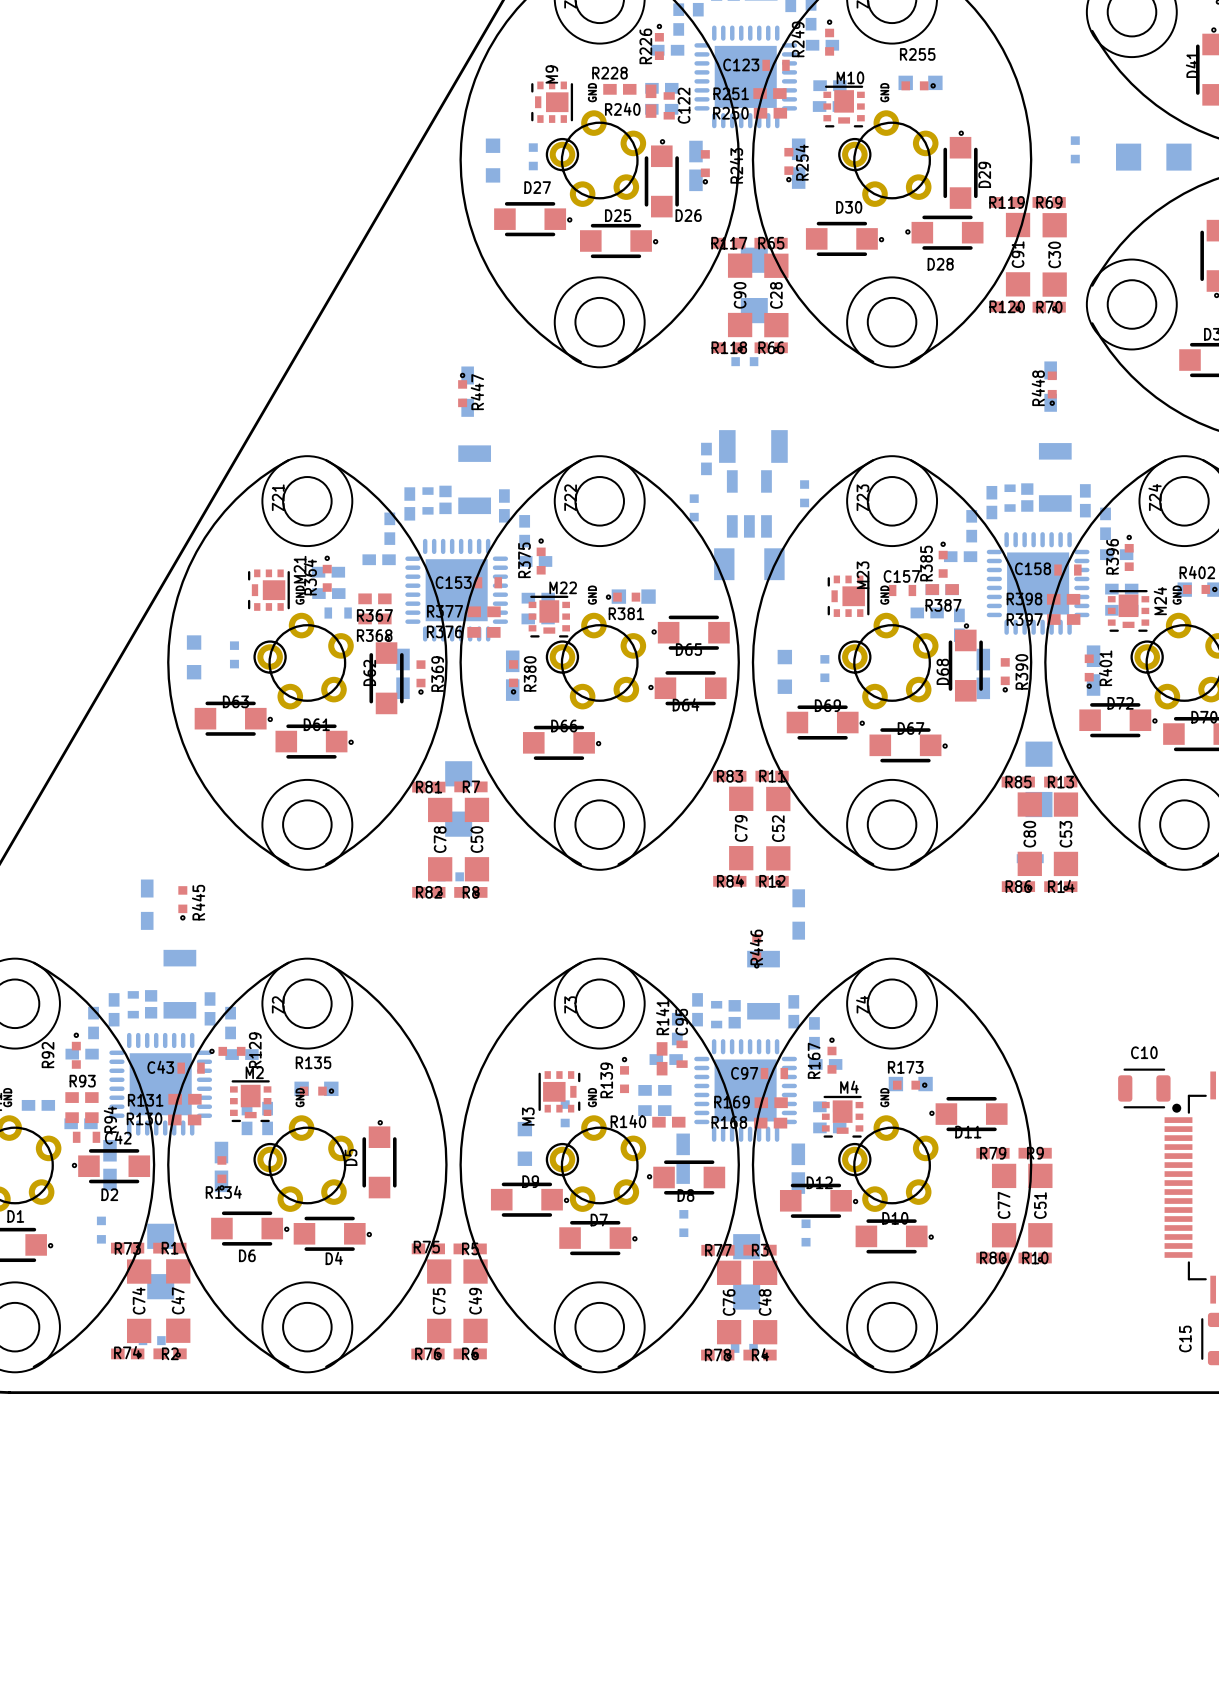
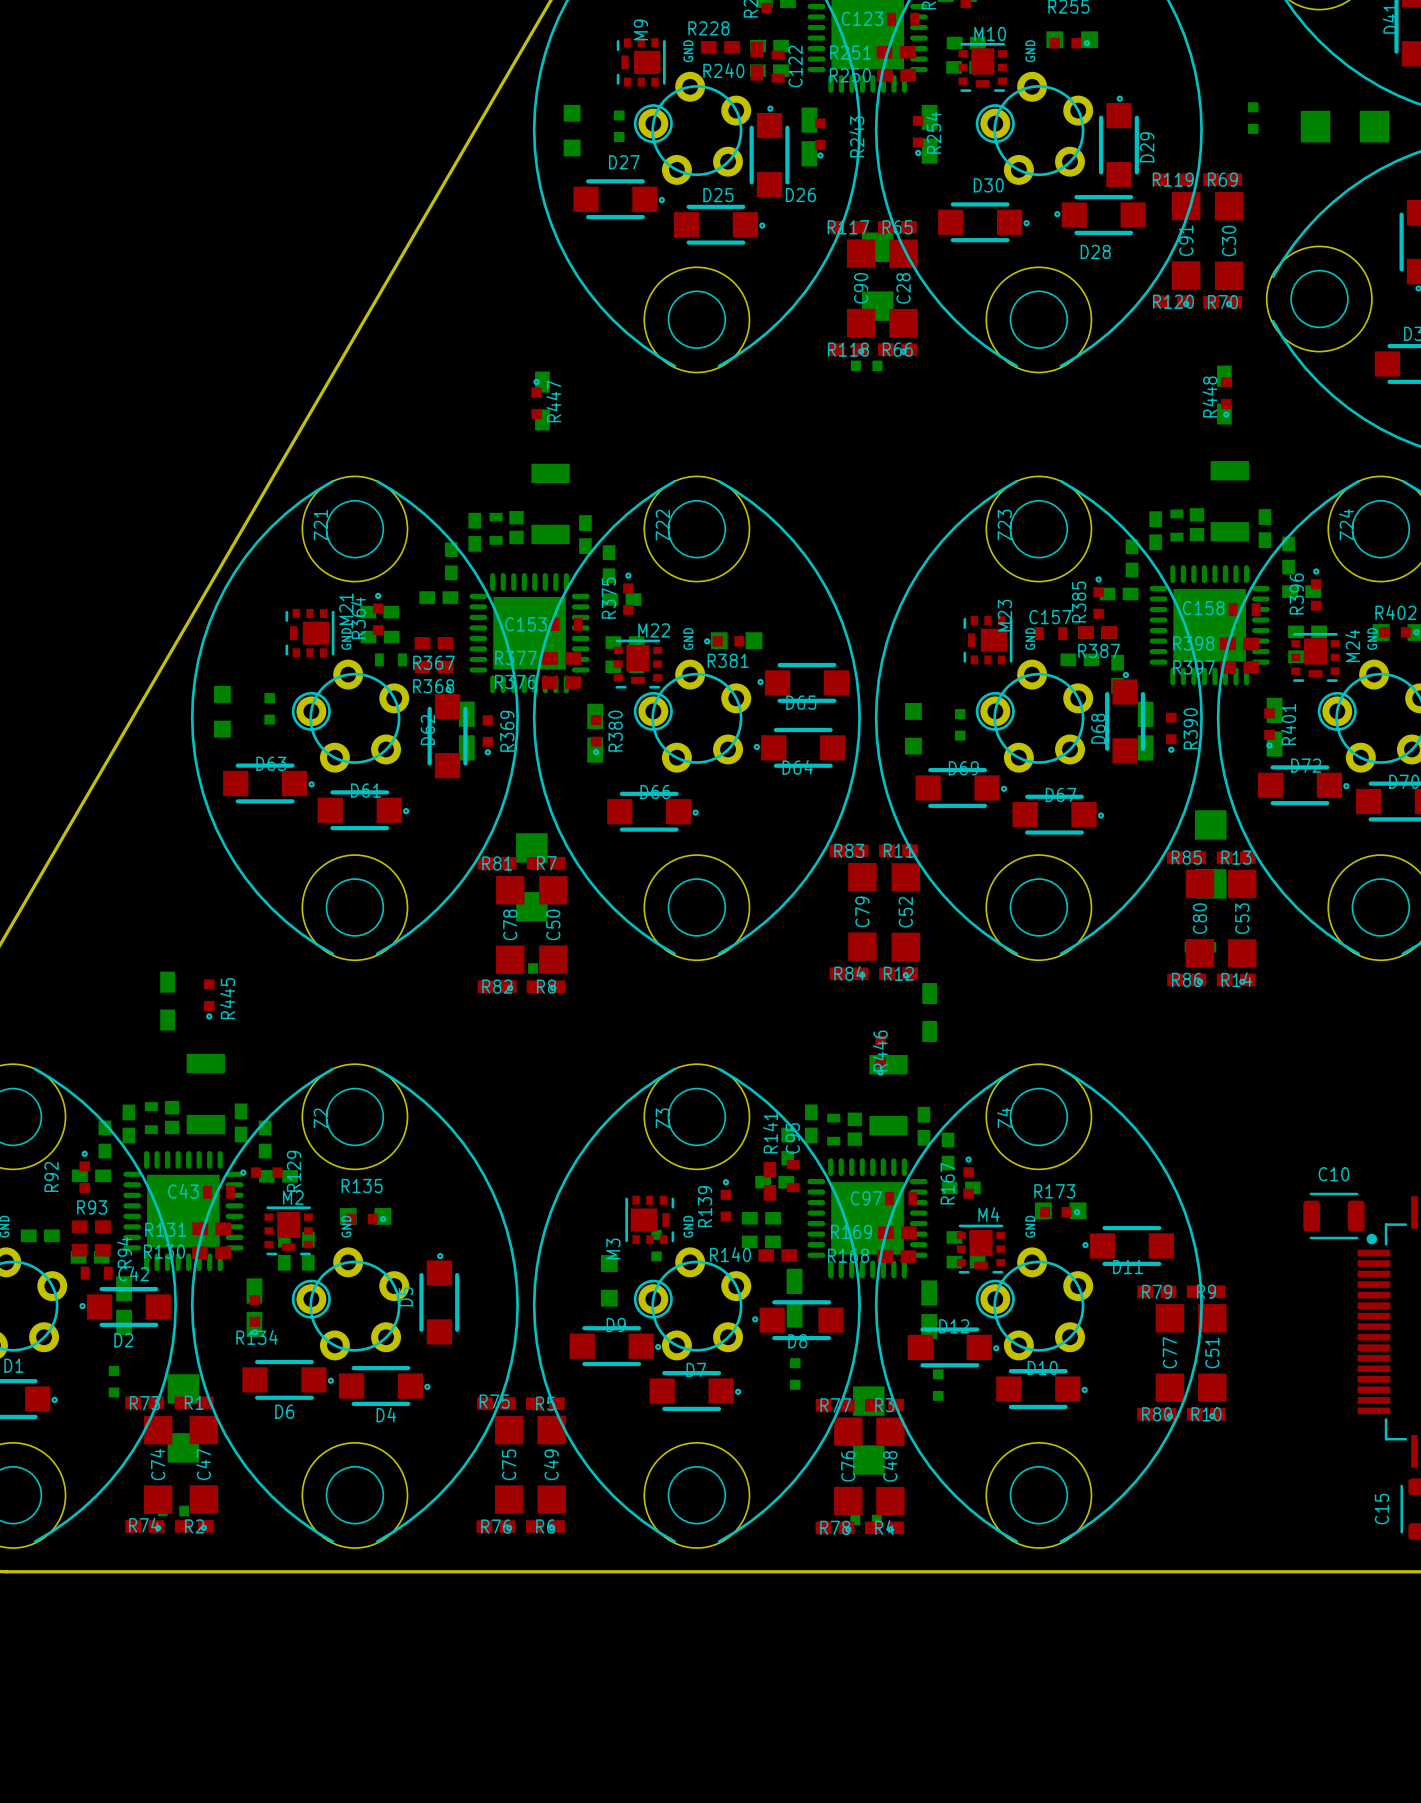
part: (753, 446) -> none
part: (706, 458) -> none
part: (804, 493) -> none
part: (749, 503) -> none
part: (694, 507) -> none
part: (749, 564) -> none

